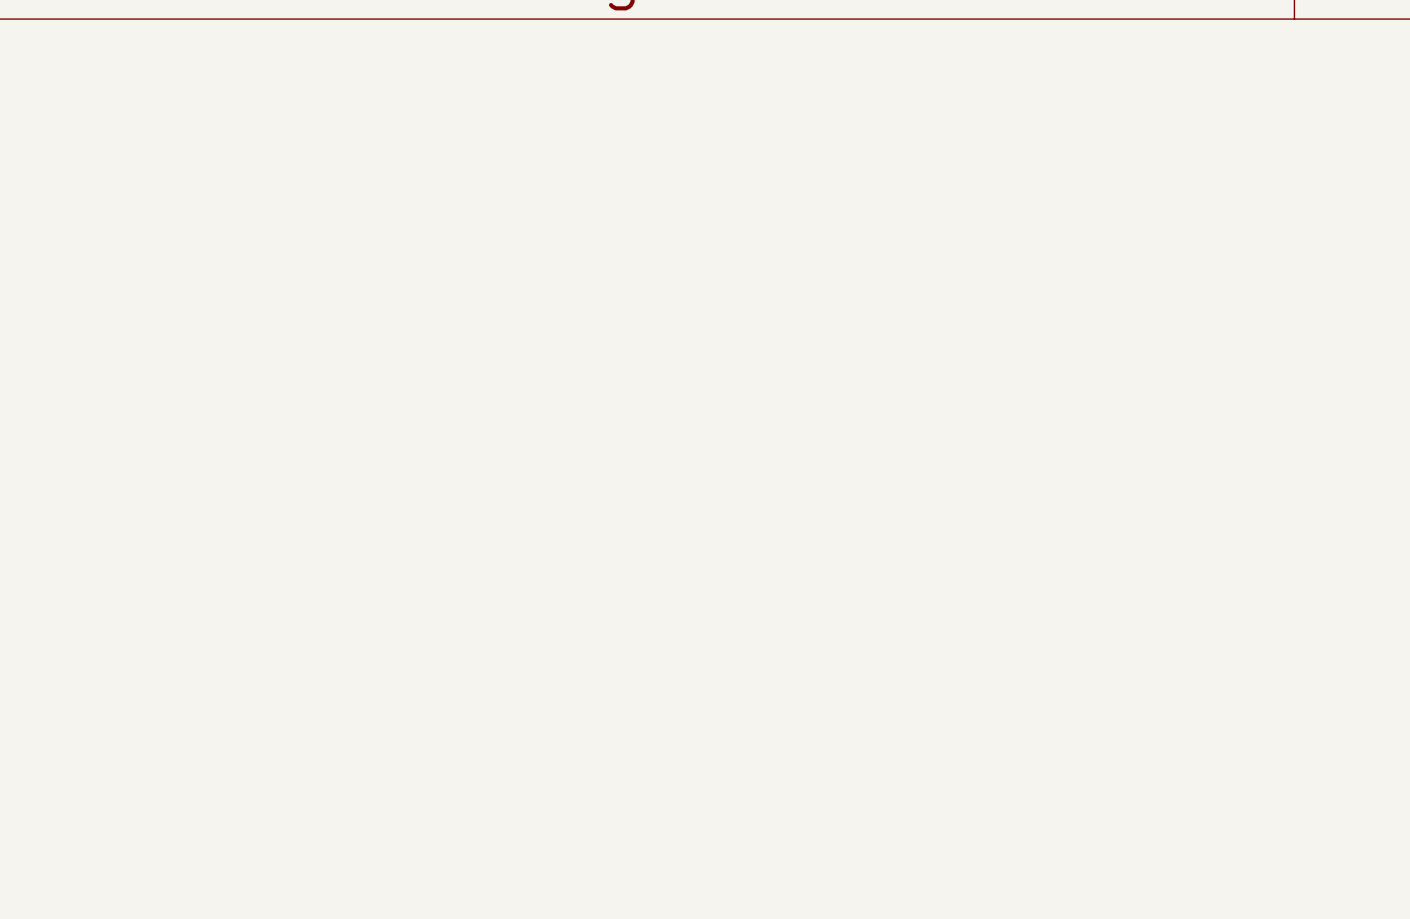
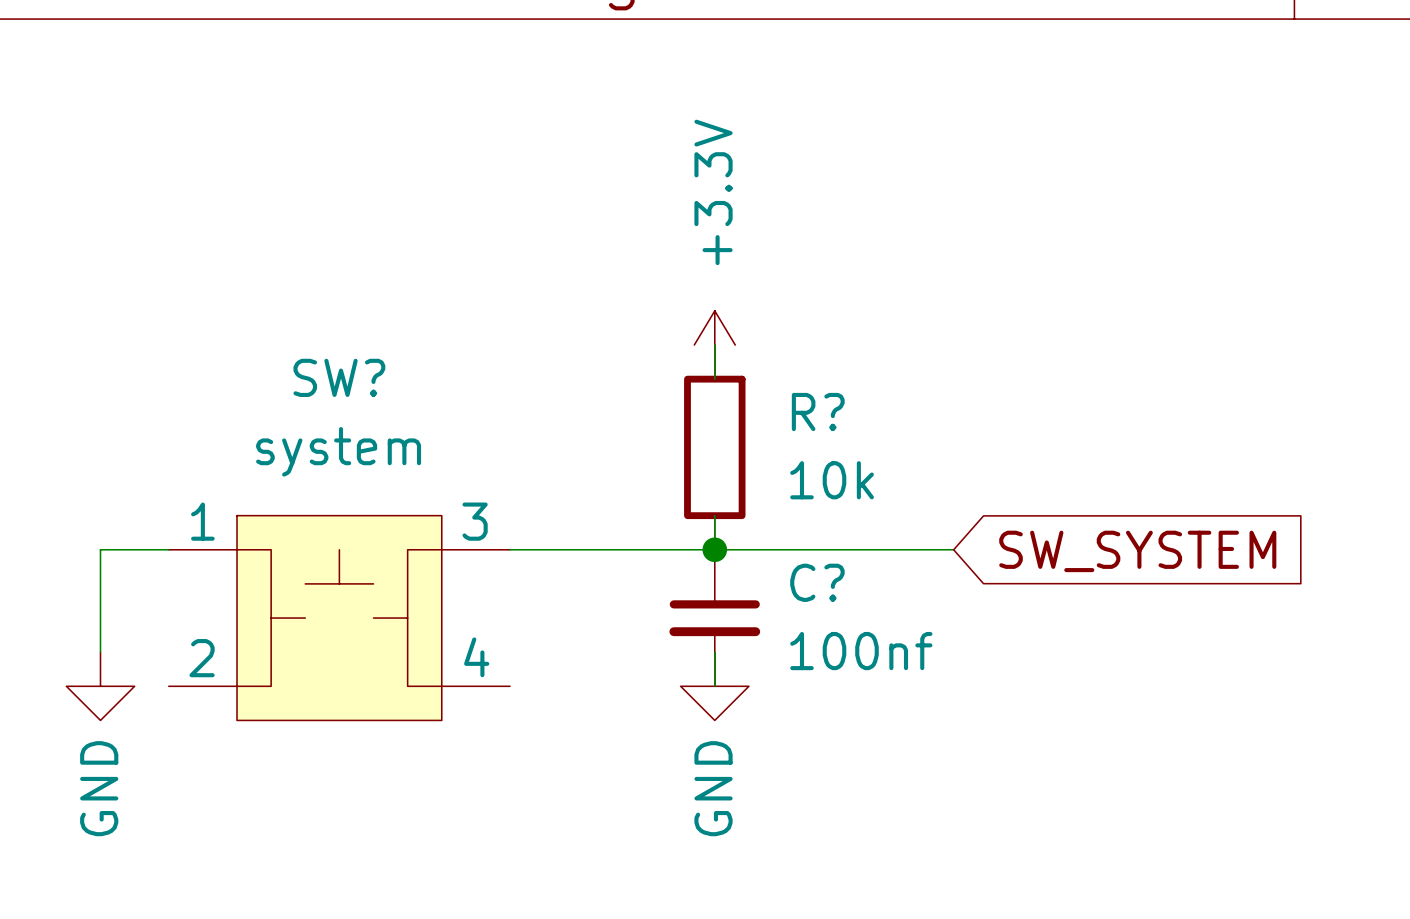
wire: none -> (714, 345) (714, 379)
power symbol: none -> +3.3V (714, 345)
R?: none -> 10k (714, 447)
wire: none -> (714, 515) (714, 549)
wire: none -> (168, 549) (100, 549) (100, 652)
wire: none -> (510, 549) (953, 549)
junction: none -> (714, 549)
global label: none -> SW_SYSTEM (1137, 551)
SW?: none -> system (339, 618)
C?: none -> 100nf (714, 618)
wire: none -> (714, 652) (714, 686)
power symbol: none -> GND (100, 686)
power symbol: none -> GND (714, 686)

